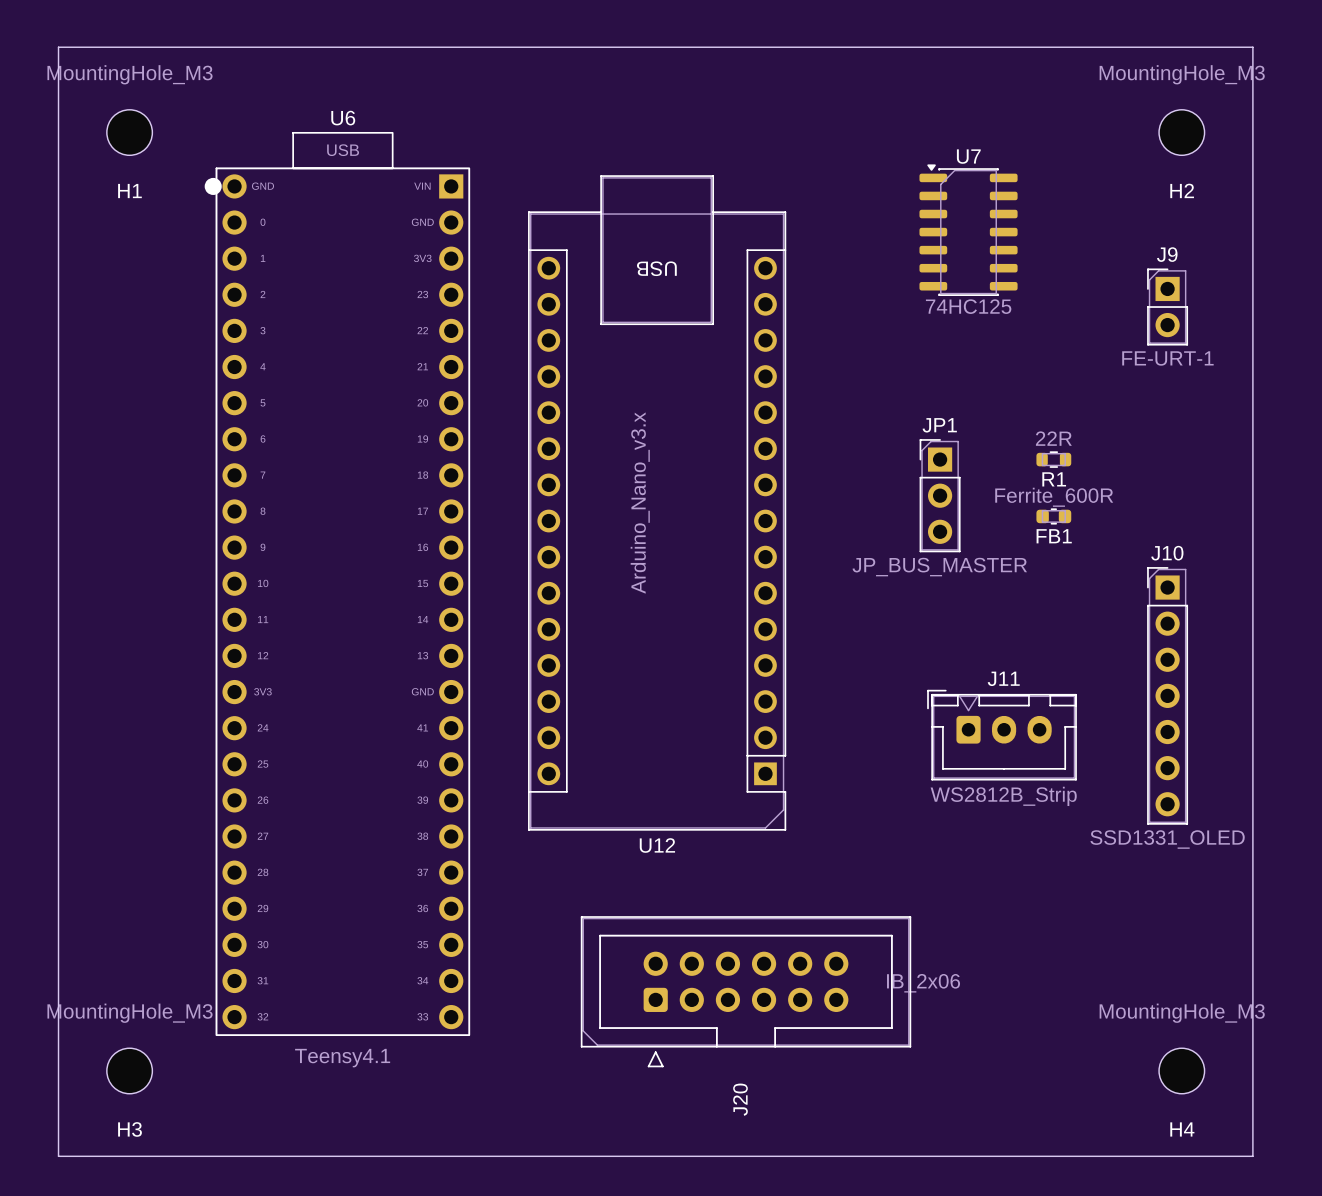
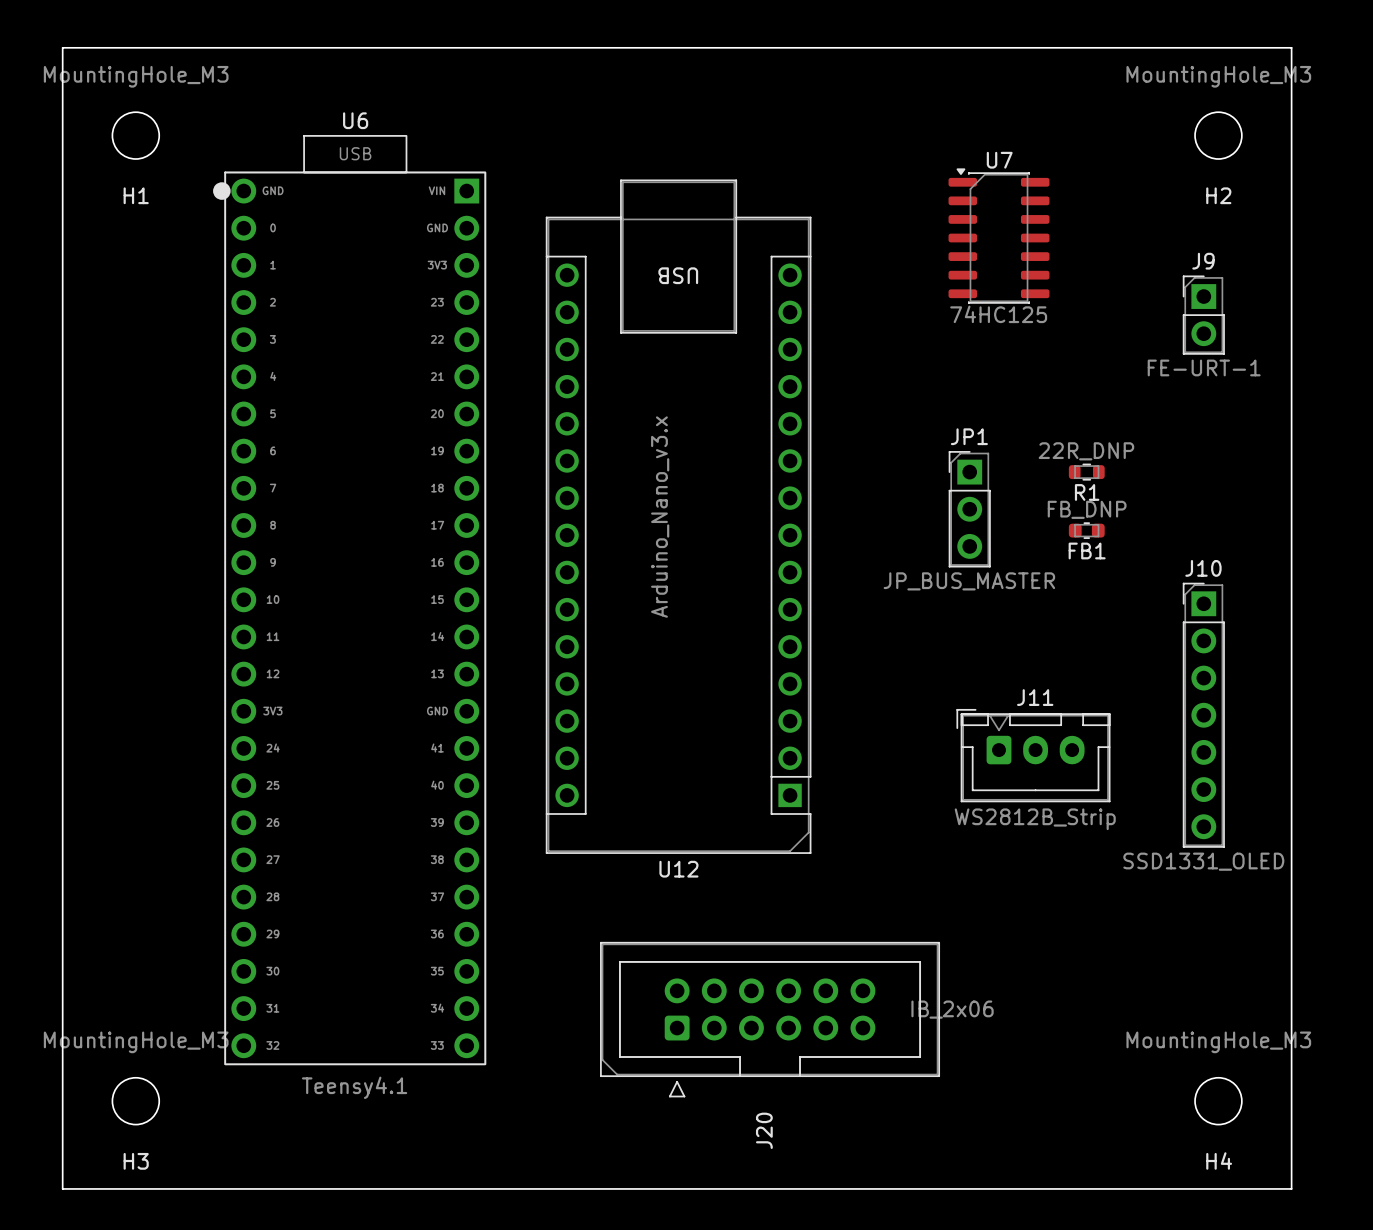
R1 value: 22R (1053, 438) -> 22R_DNP (1086, 451)
FB1 value: Ferrite_600R (1054, 497) -> FB_DNP (1087, 509)

